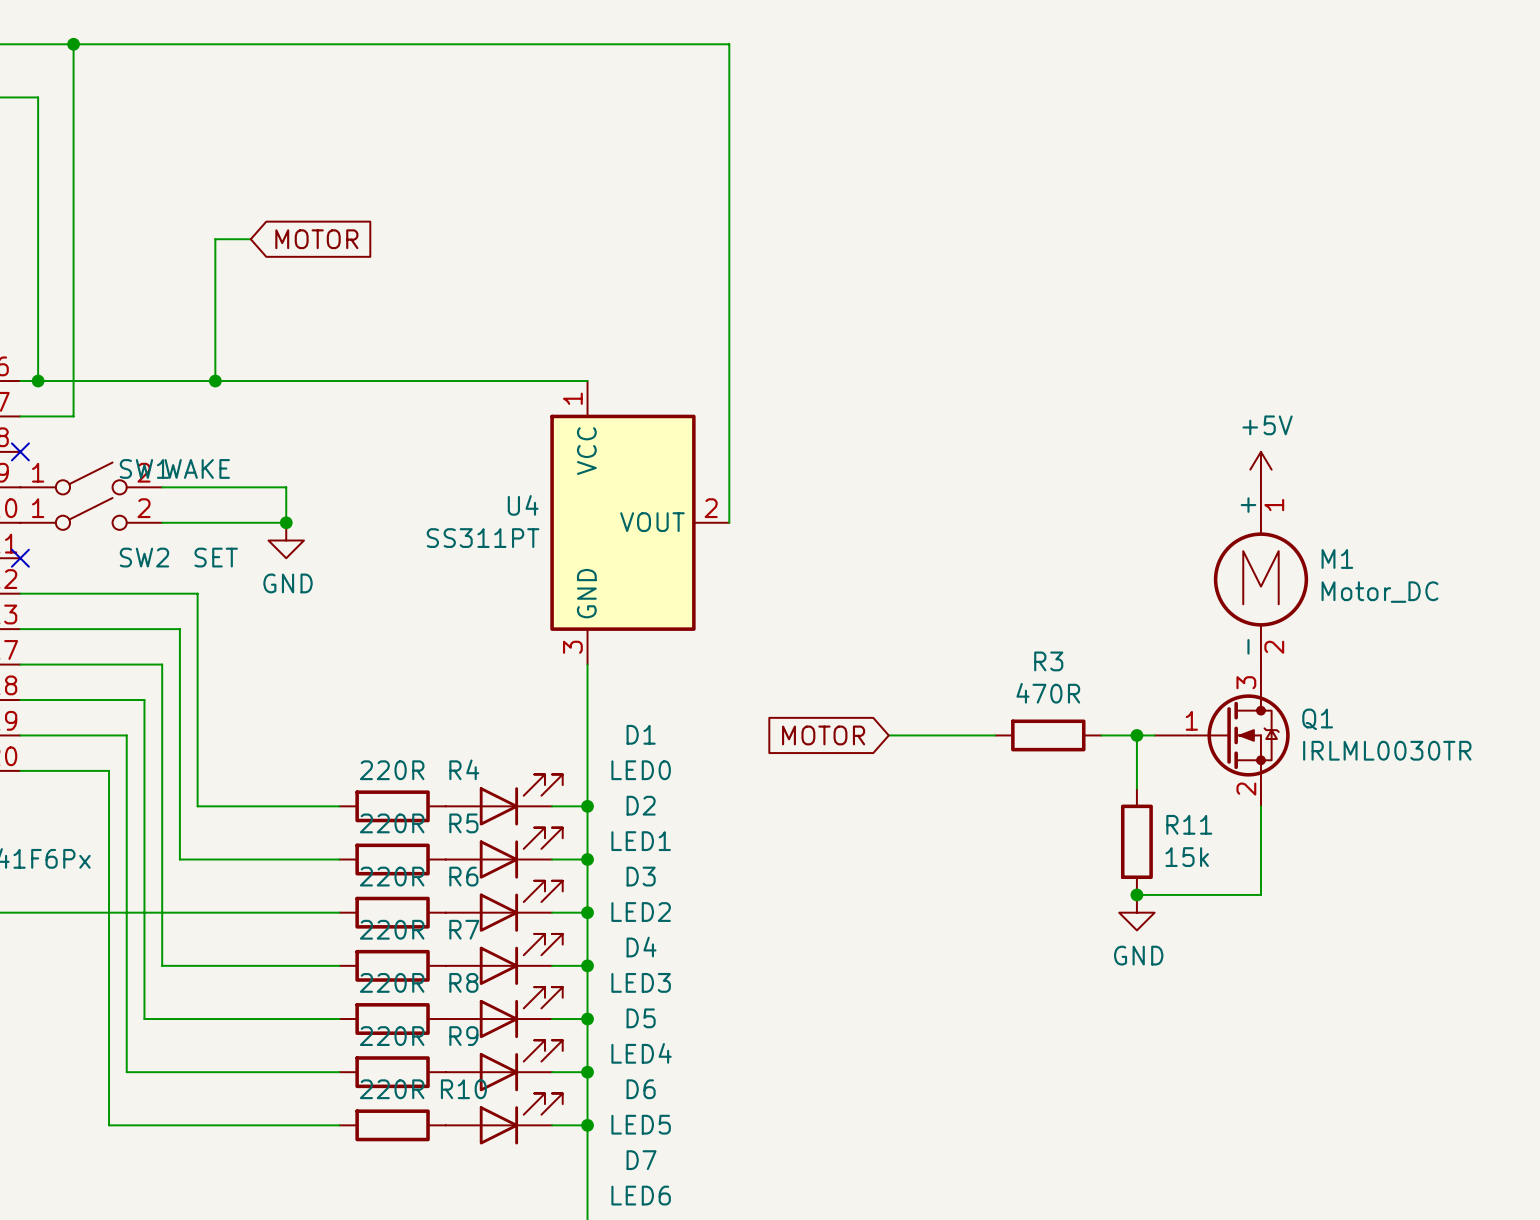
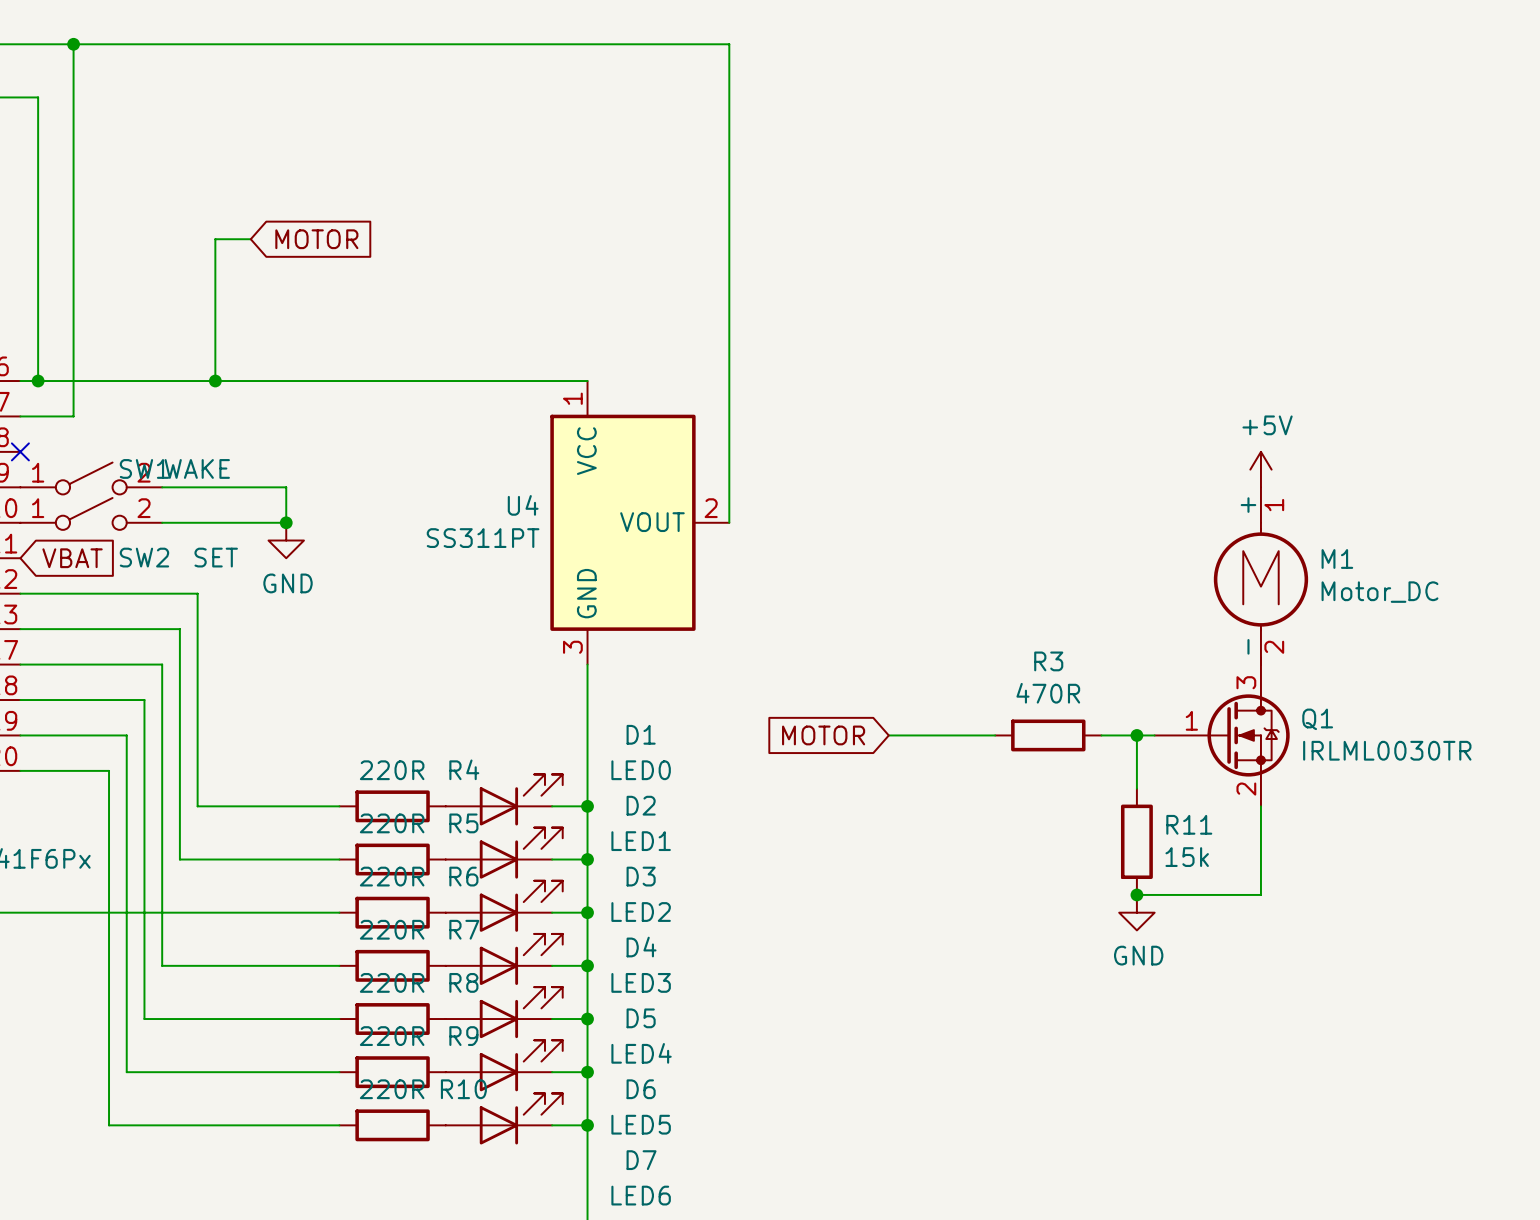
no-connect mark: (20, 558) -> none
global label: none -> VBAT (72, 558)

